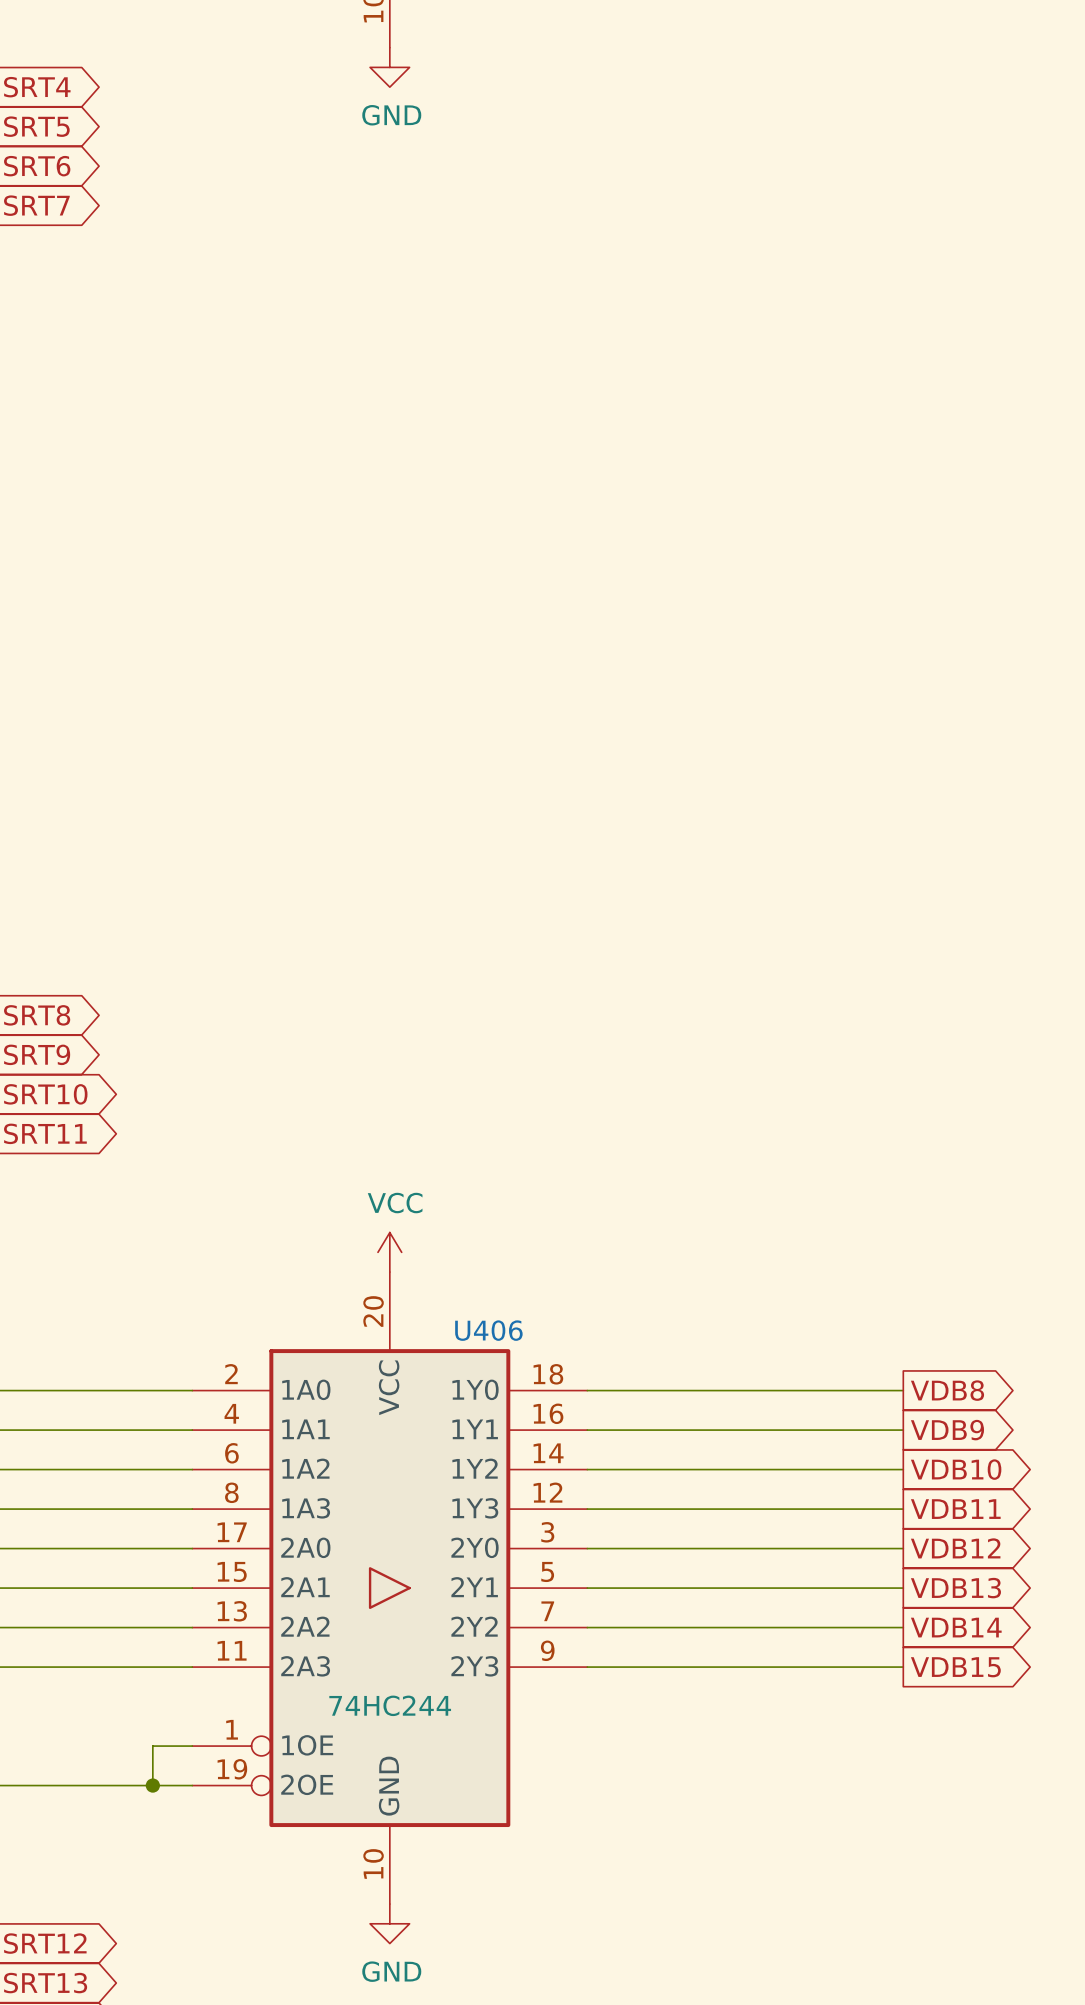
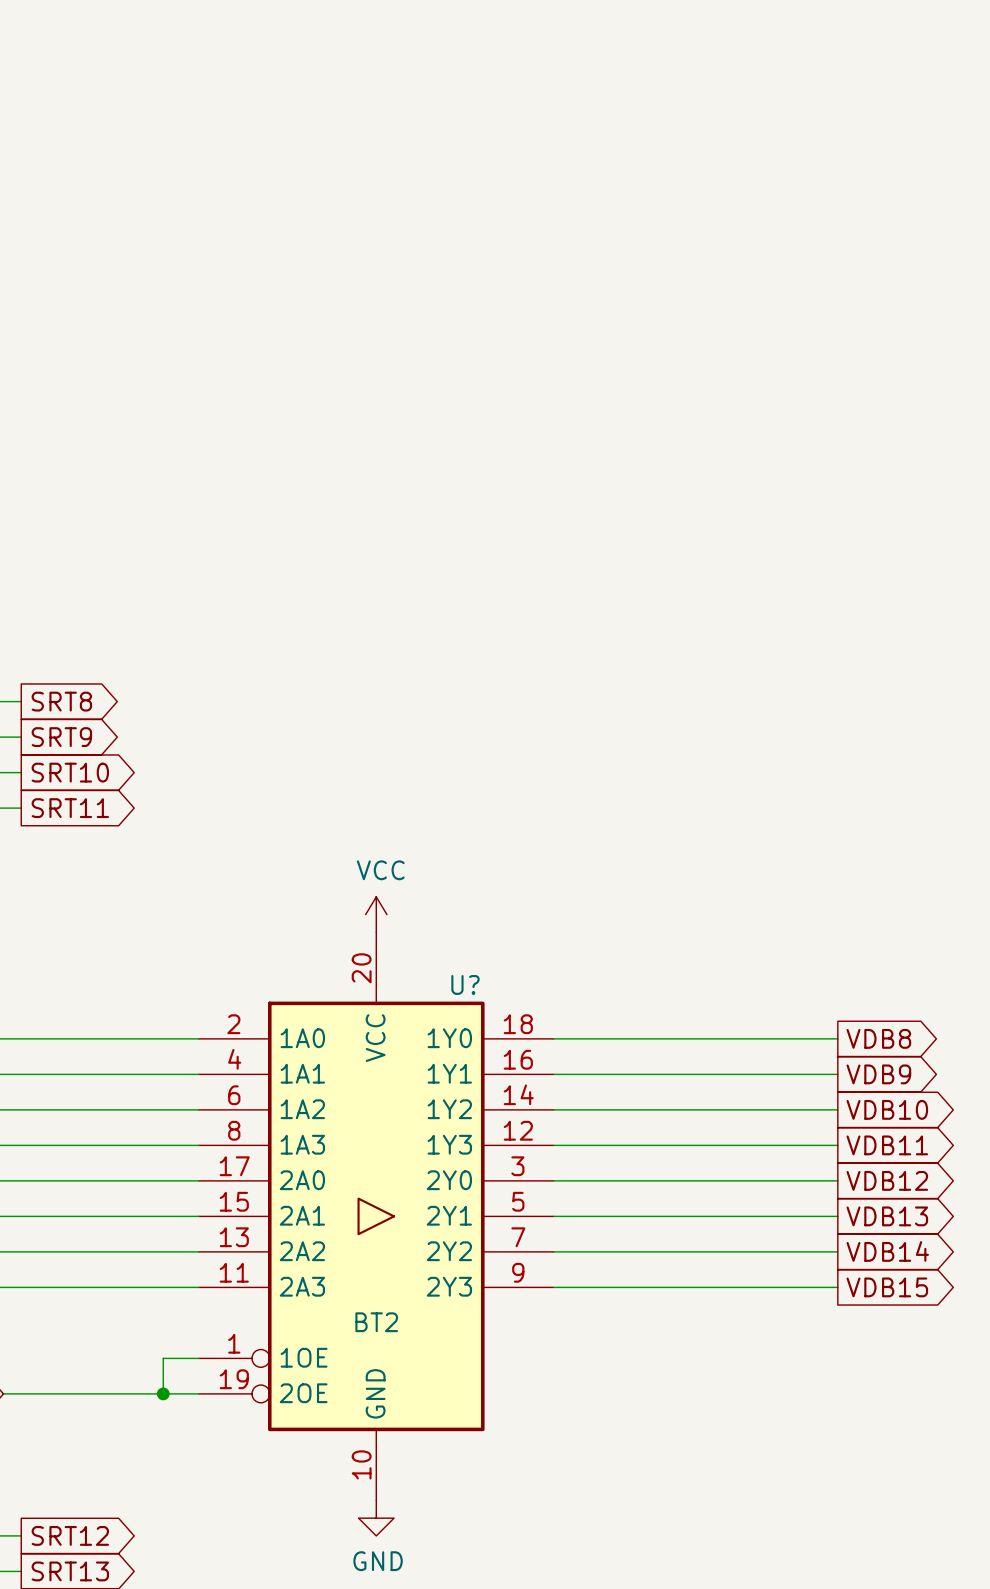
U406 name: U406 (488, 1330) -> U? (465, 984)
U406 value: 74HC244 (390, 1705) -> BT2 (376, 1322)

